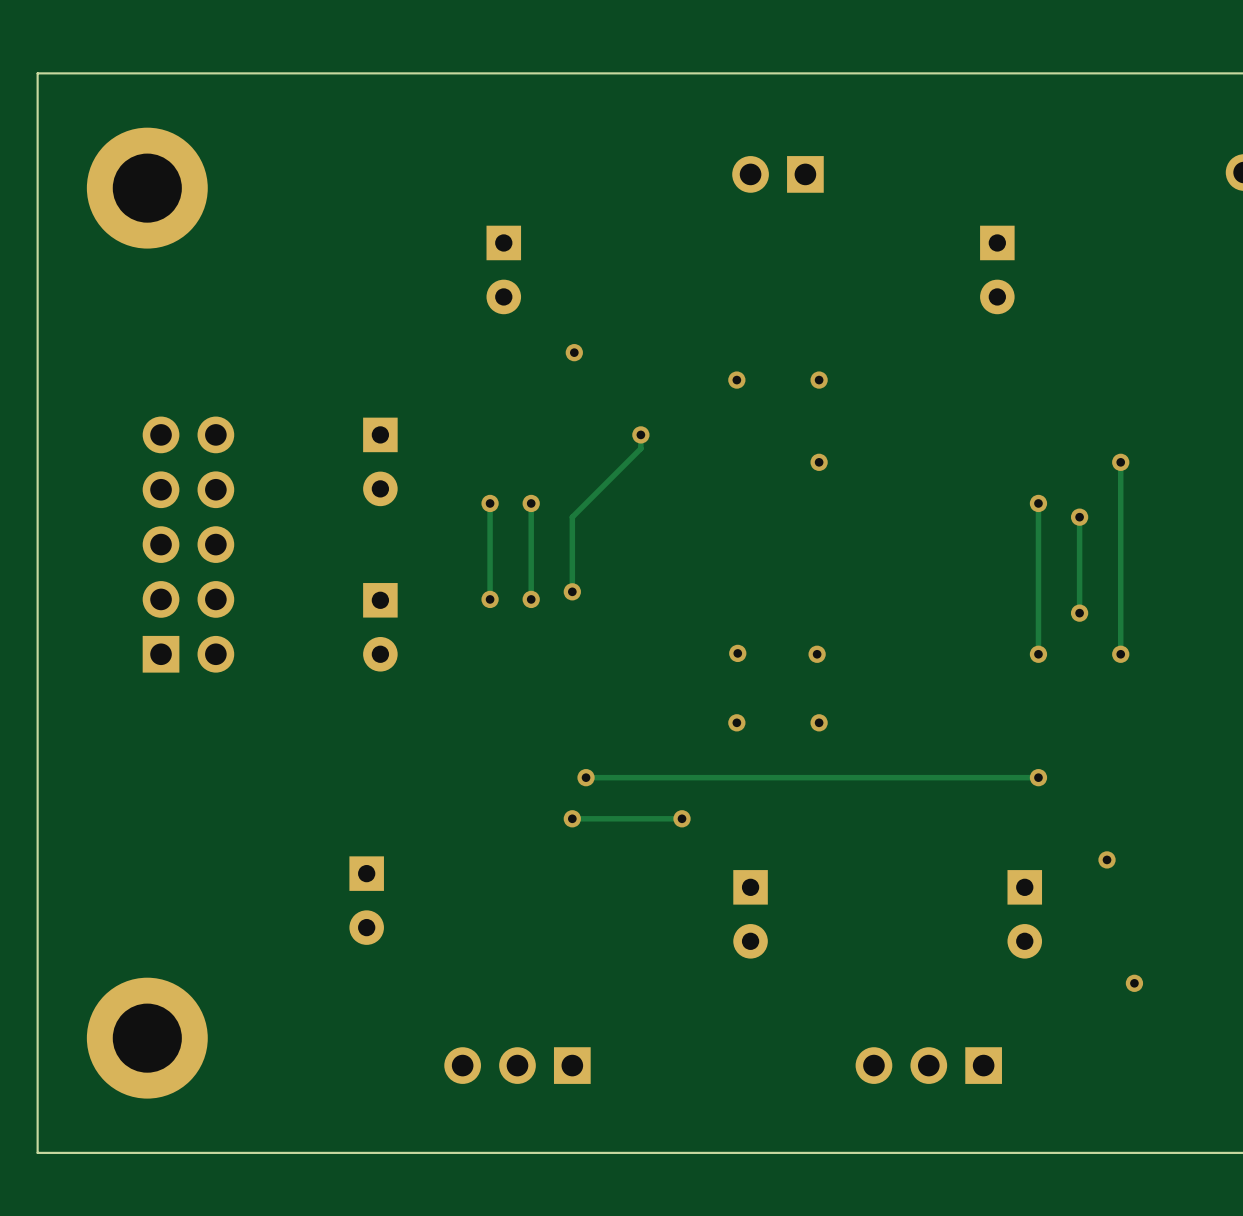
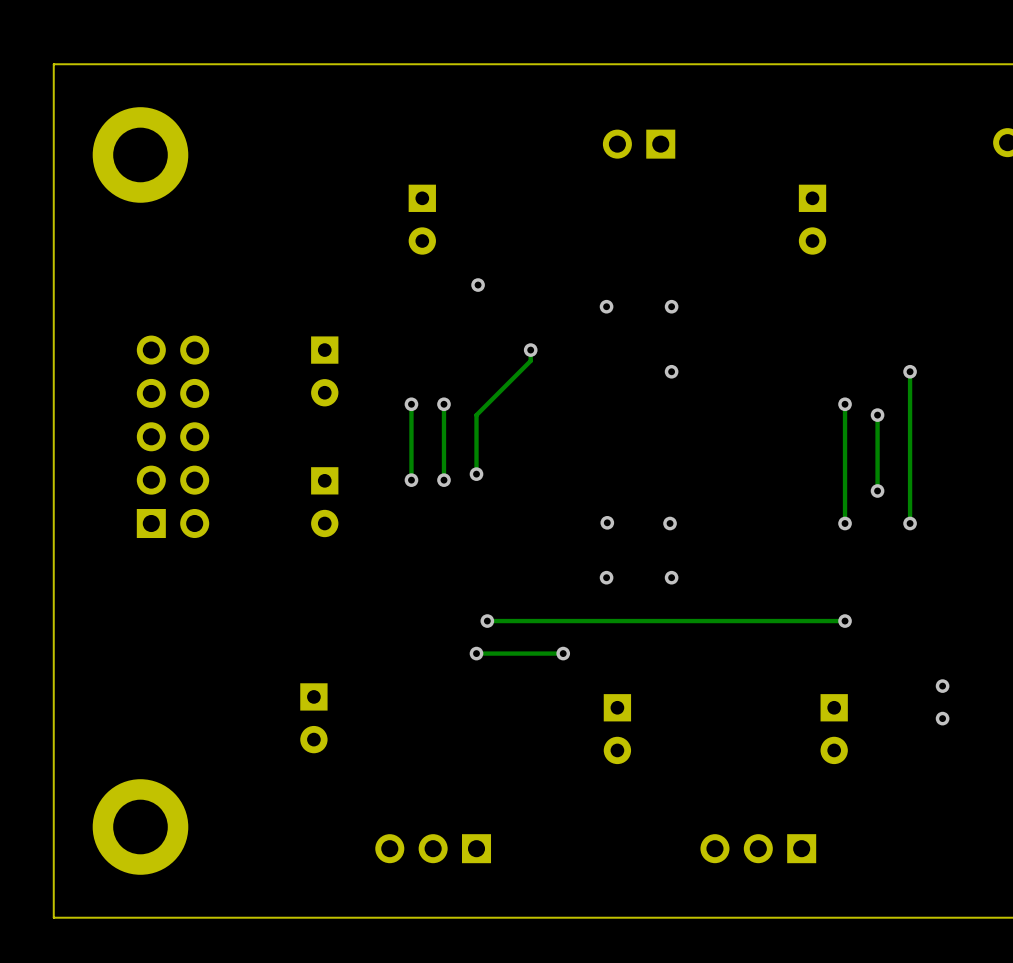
via: (1107, 859) -> none
via: none -> (942, 686)
via: none -> (942, 718)
via: (1134, 983) -> none

